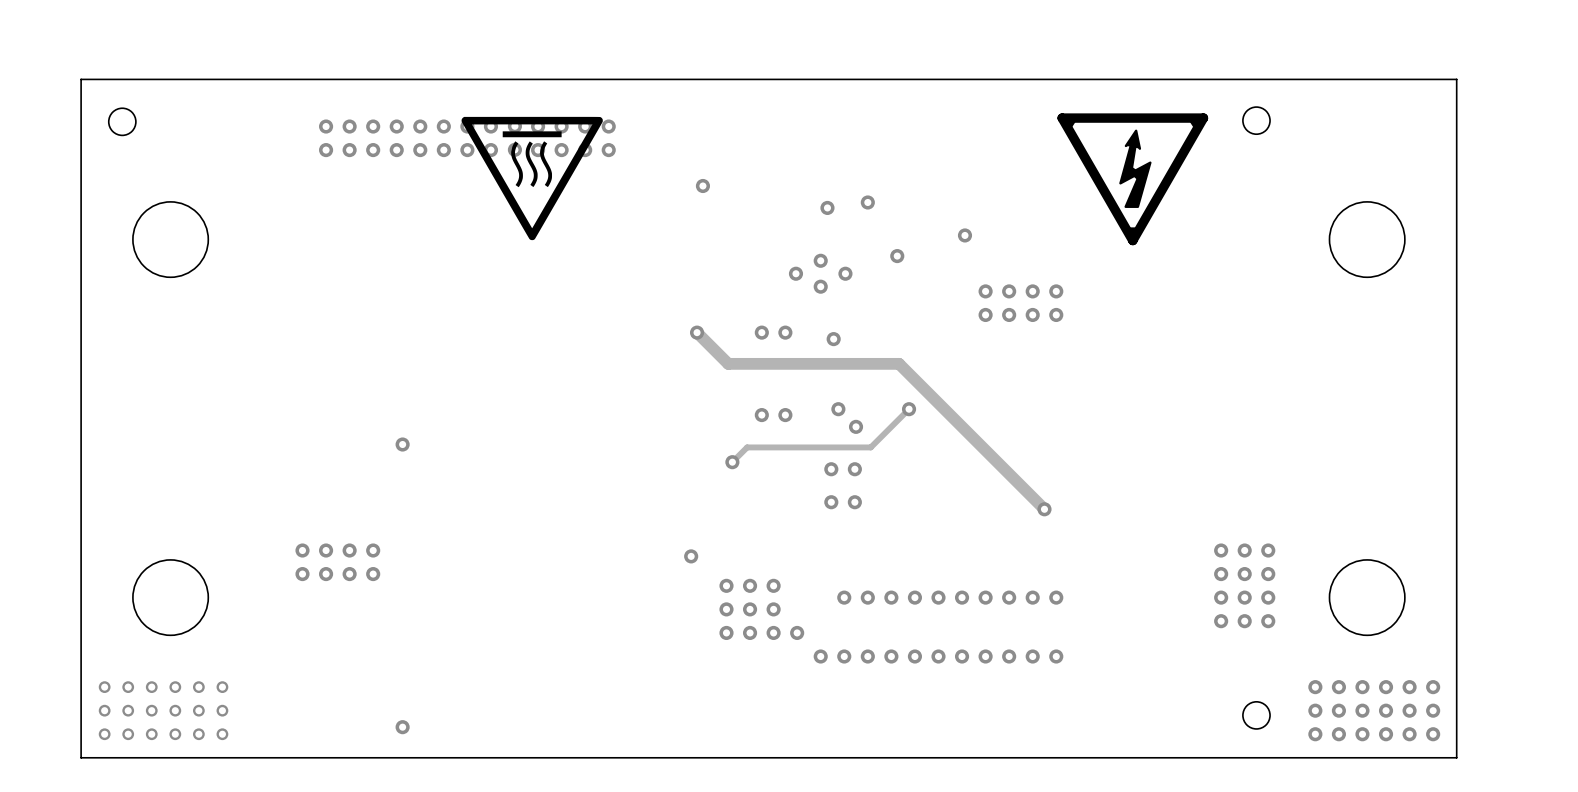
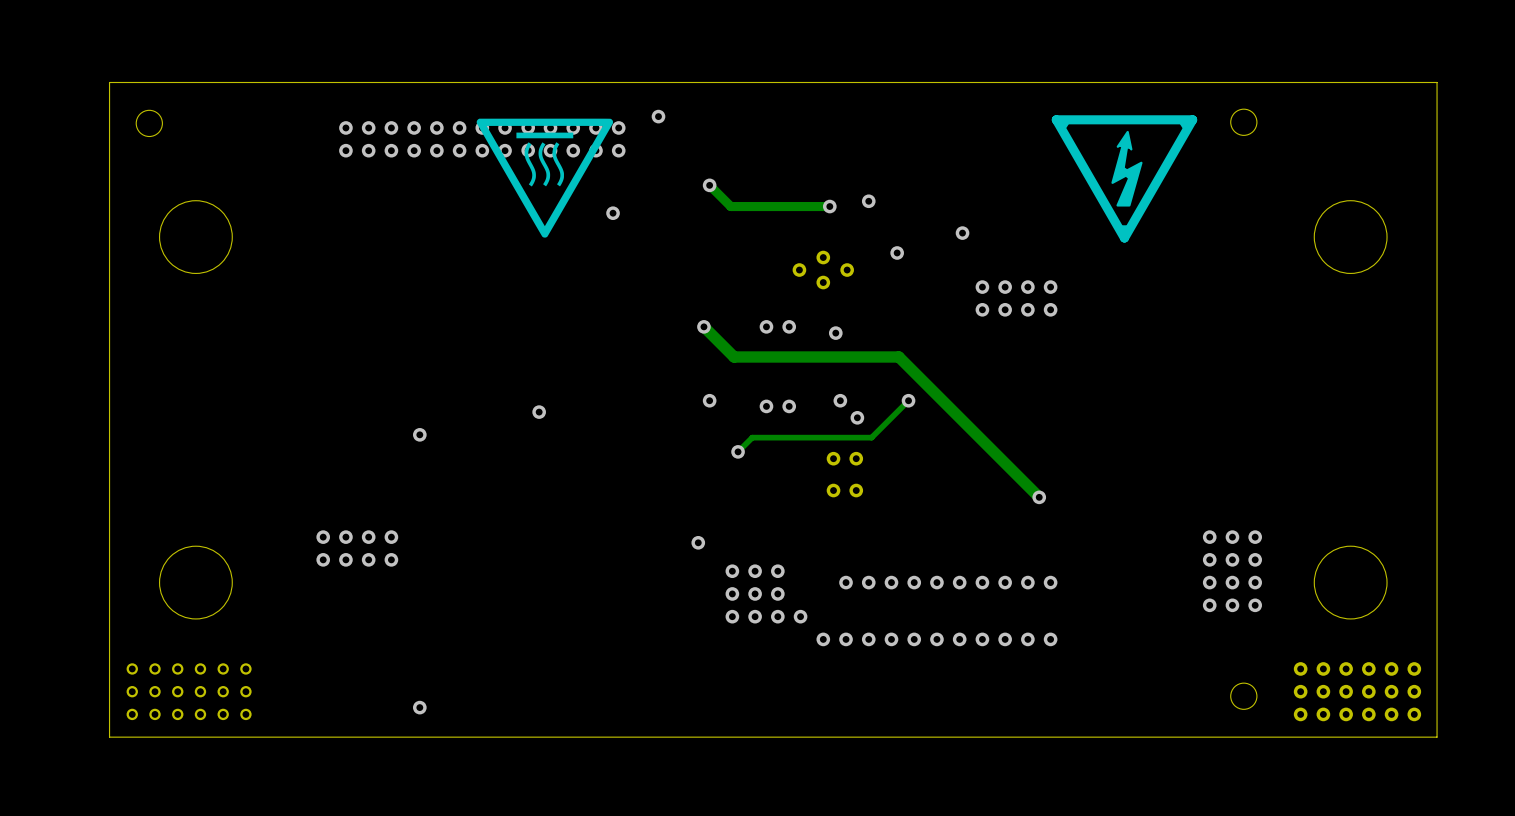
via: none -> (658, 116)
track: none -> (709, 185) (730, 206) (829, 206)
via: none -> (613, 213)
via: none -> (709, 400)
via: none -> (539, 412)

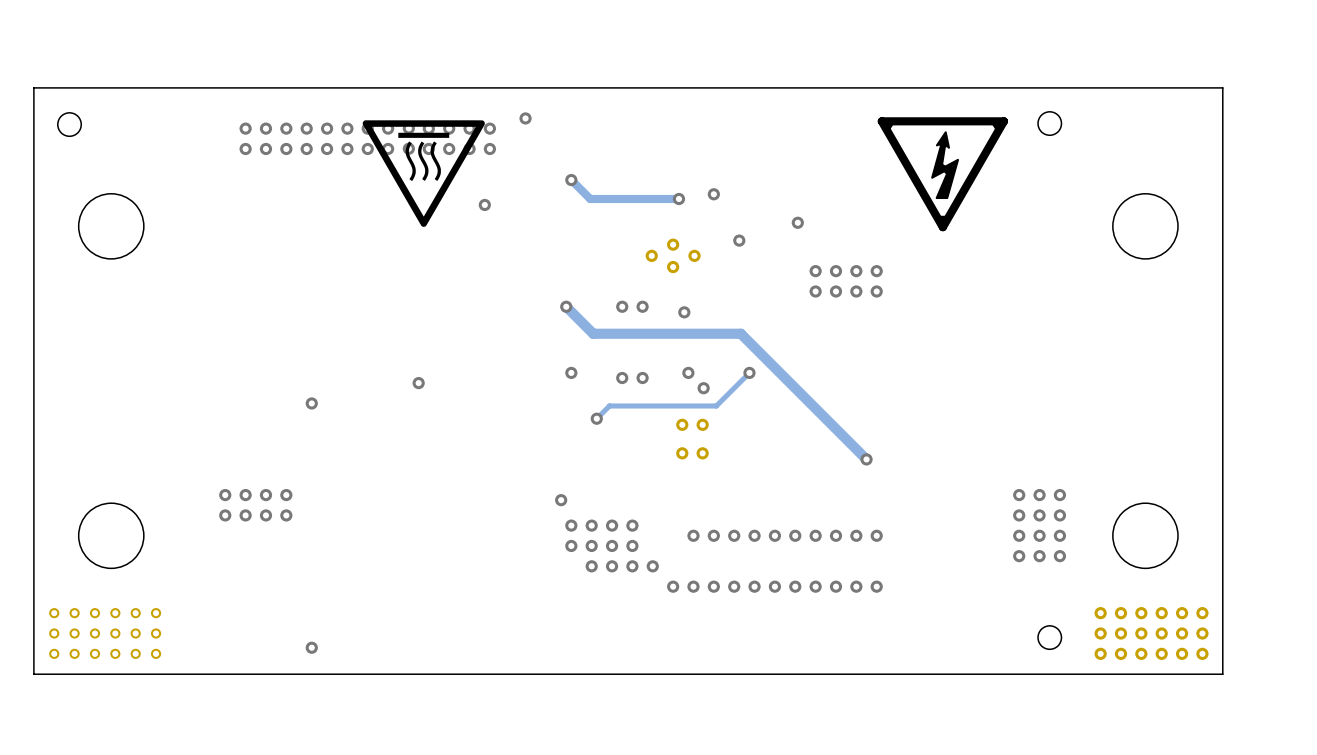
via: none -> (571, 525)
via: none -> (571, 545)

